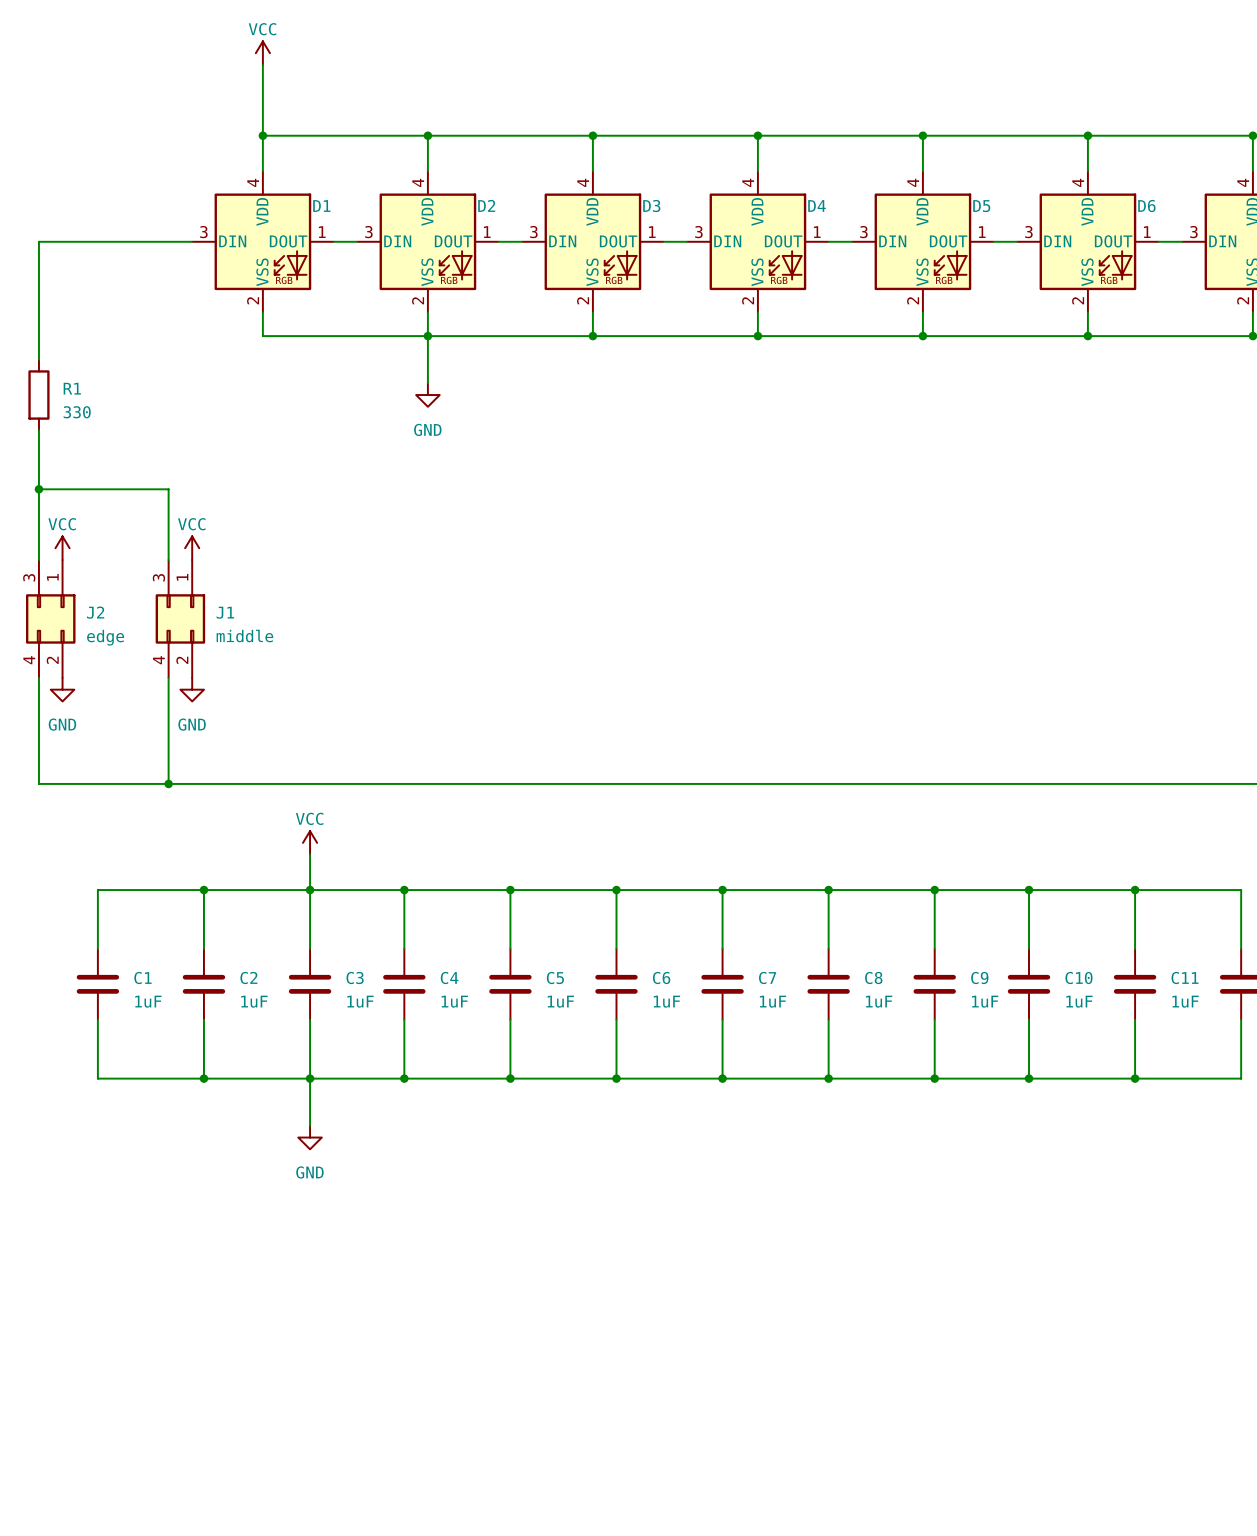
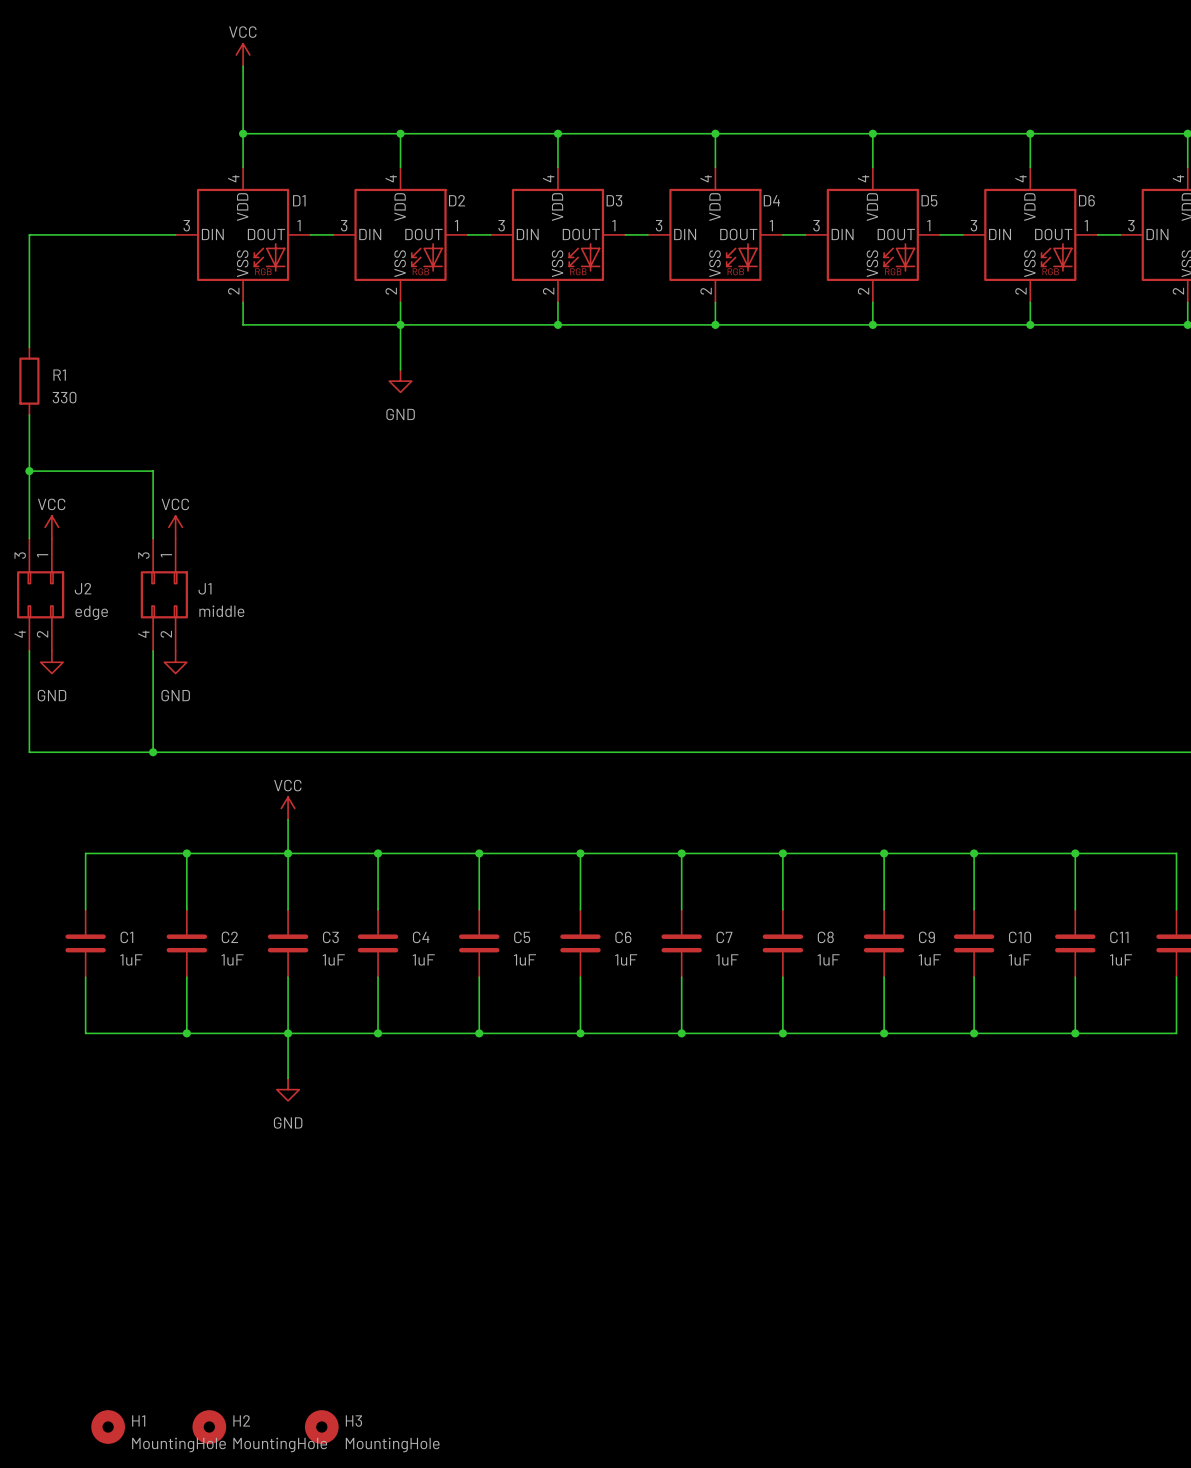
H1: none -> MountingHole (108, 1427)
H2: none -> MountingHole (209, 1427)
H3: none -> MountingHole (321, 1427)

